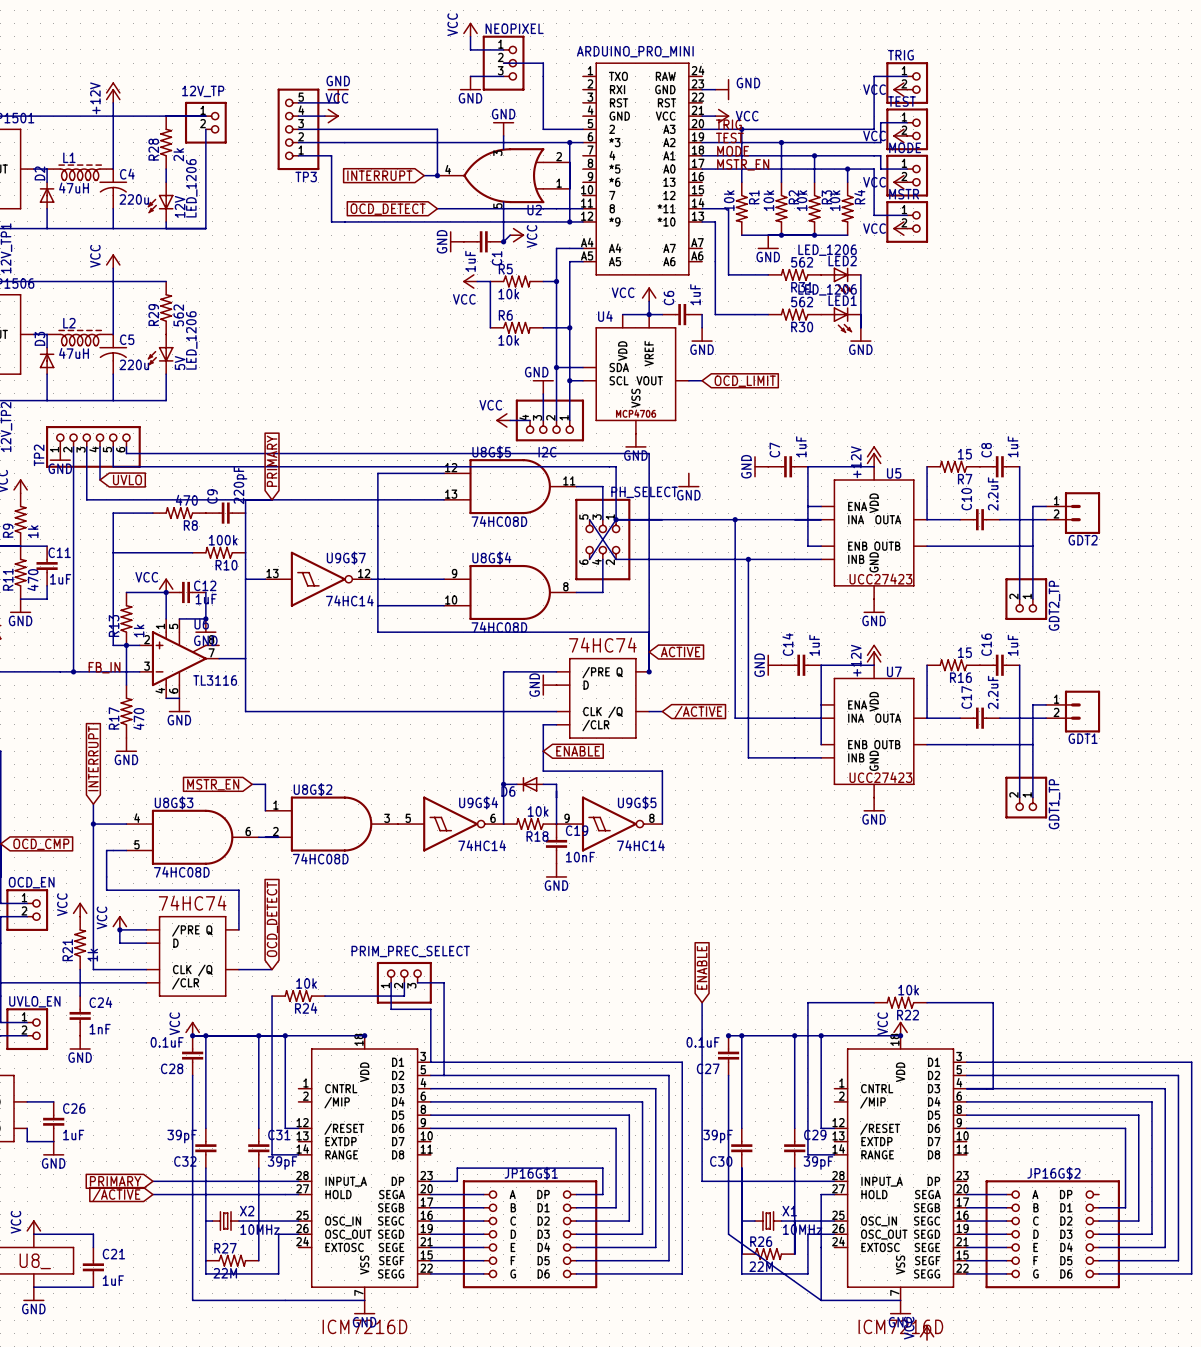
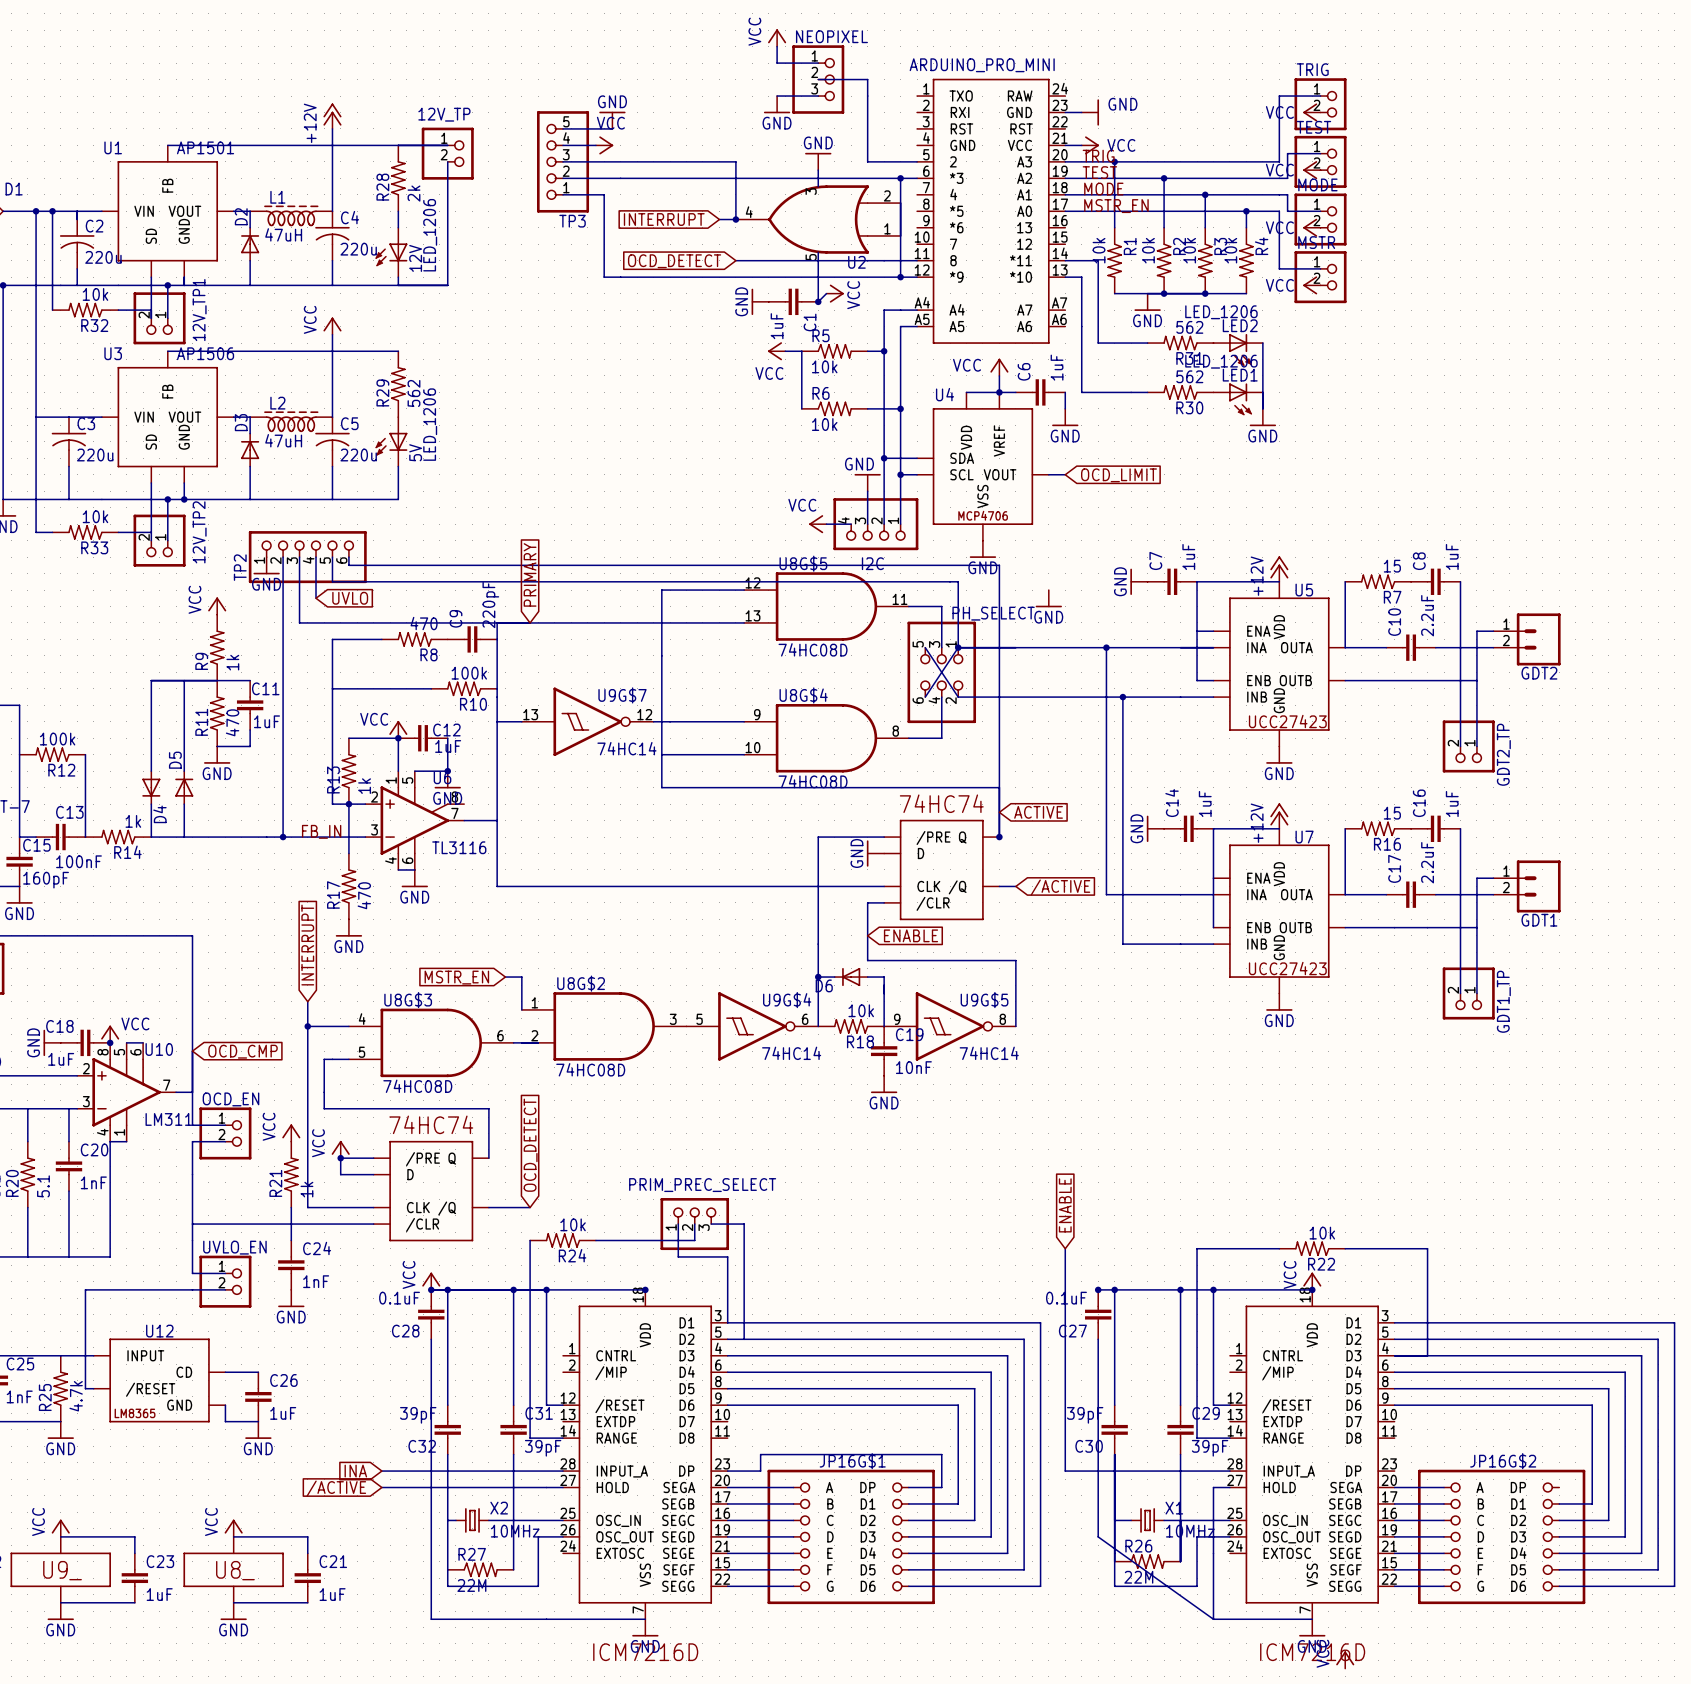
global label: PRIMARY (115, 1181) -> INA (355, 1471)

